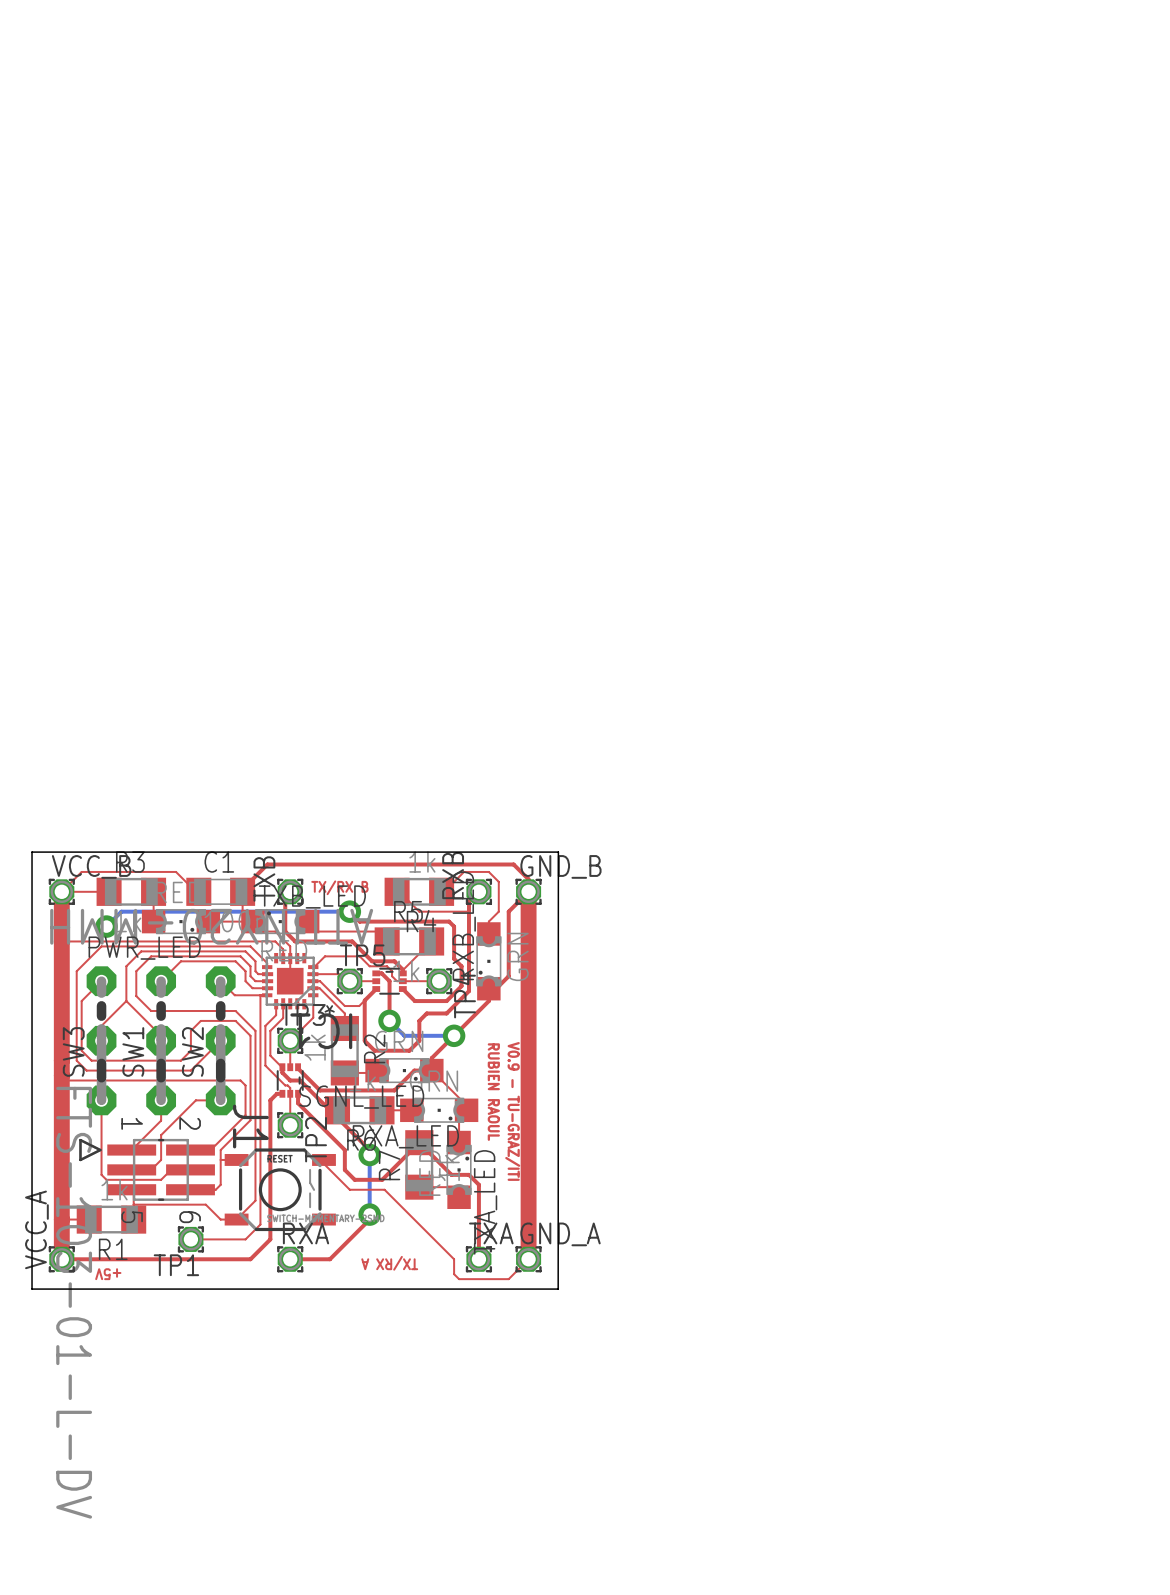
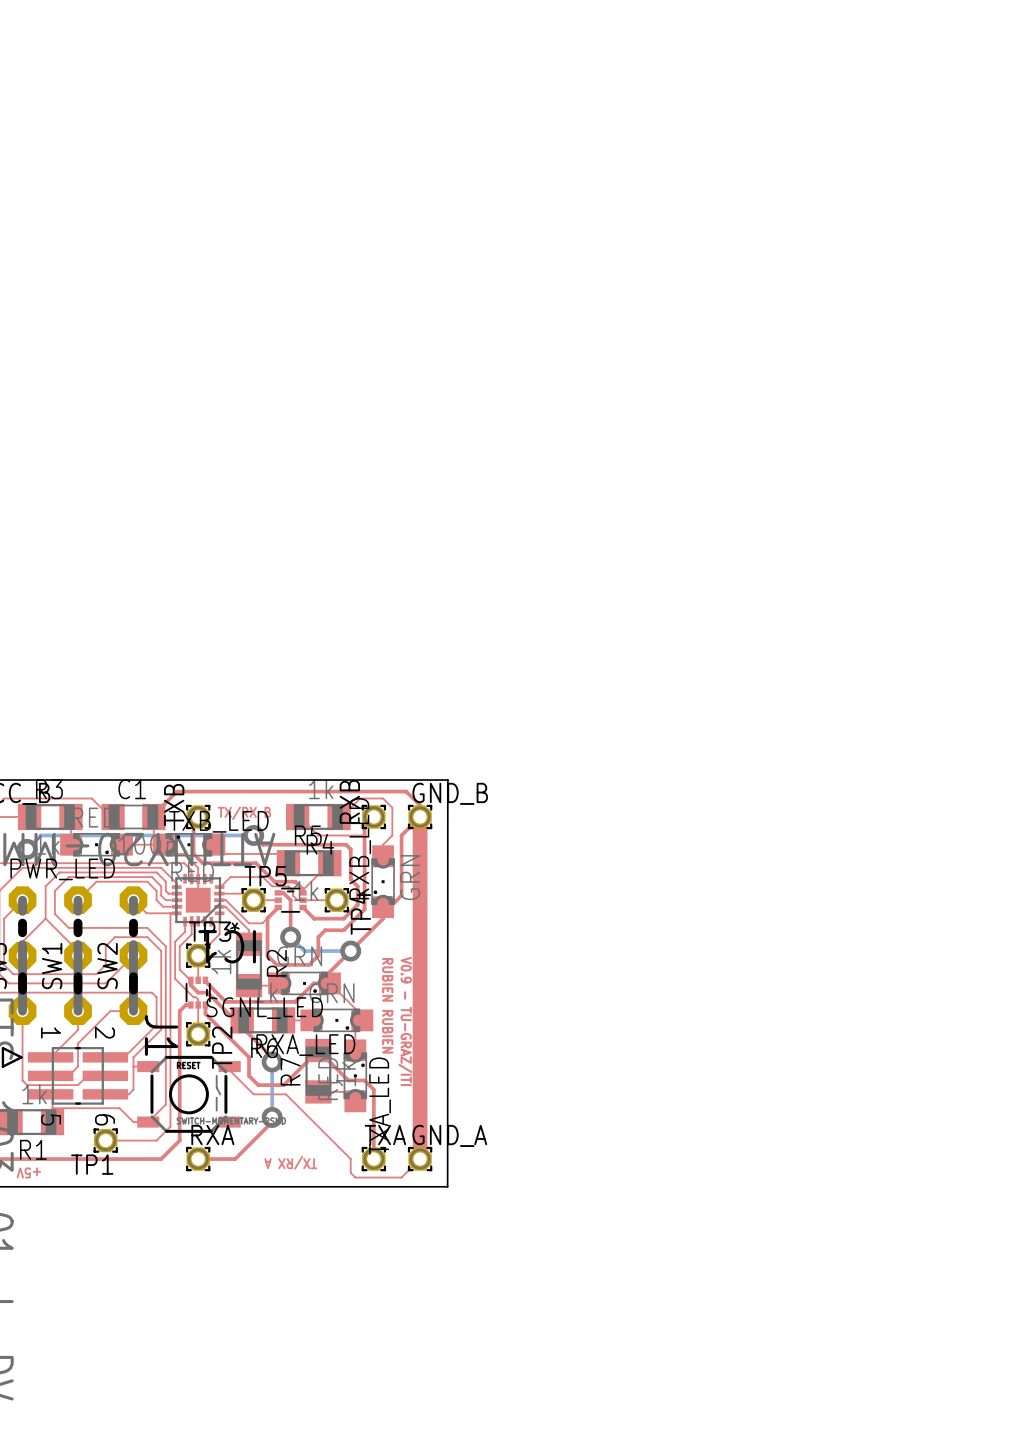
text: RUBIEN RAOUL (493, 1092) -> RUBIEN RUBIEN (387, 1005)

